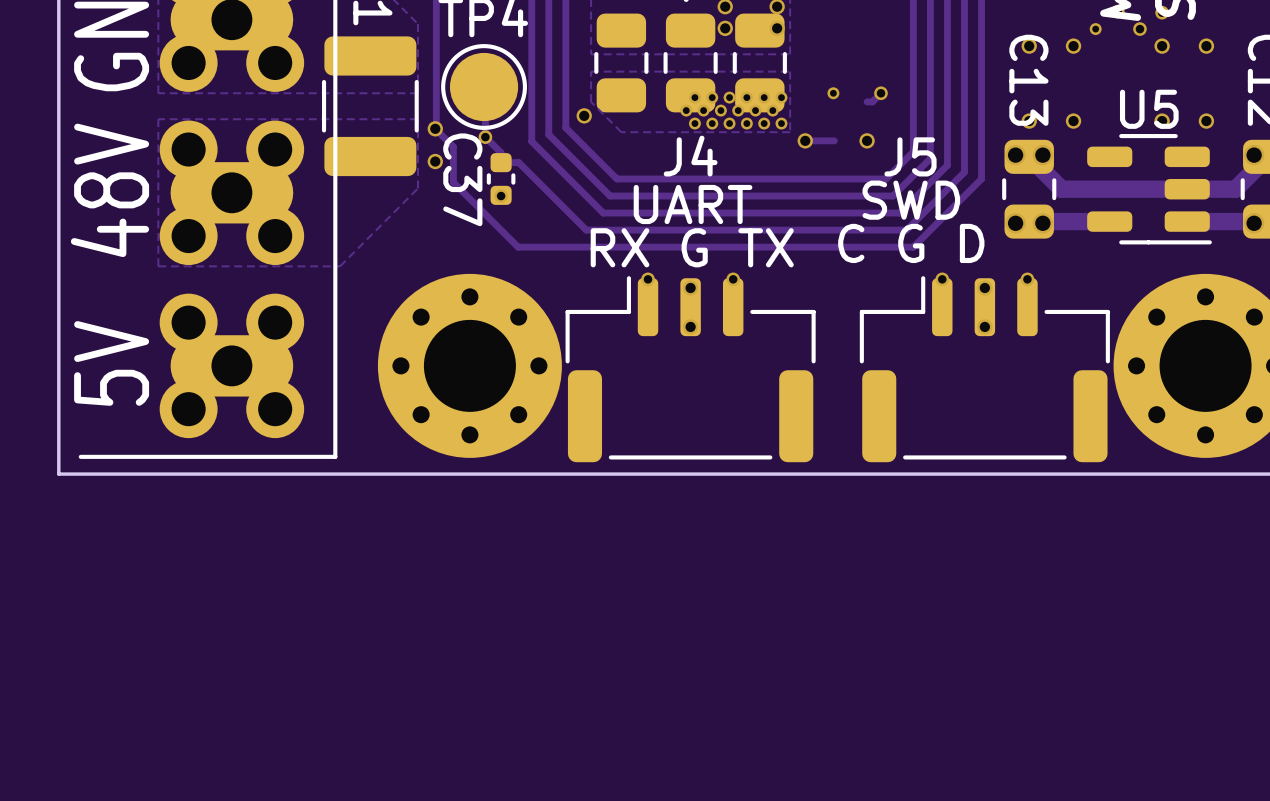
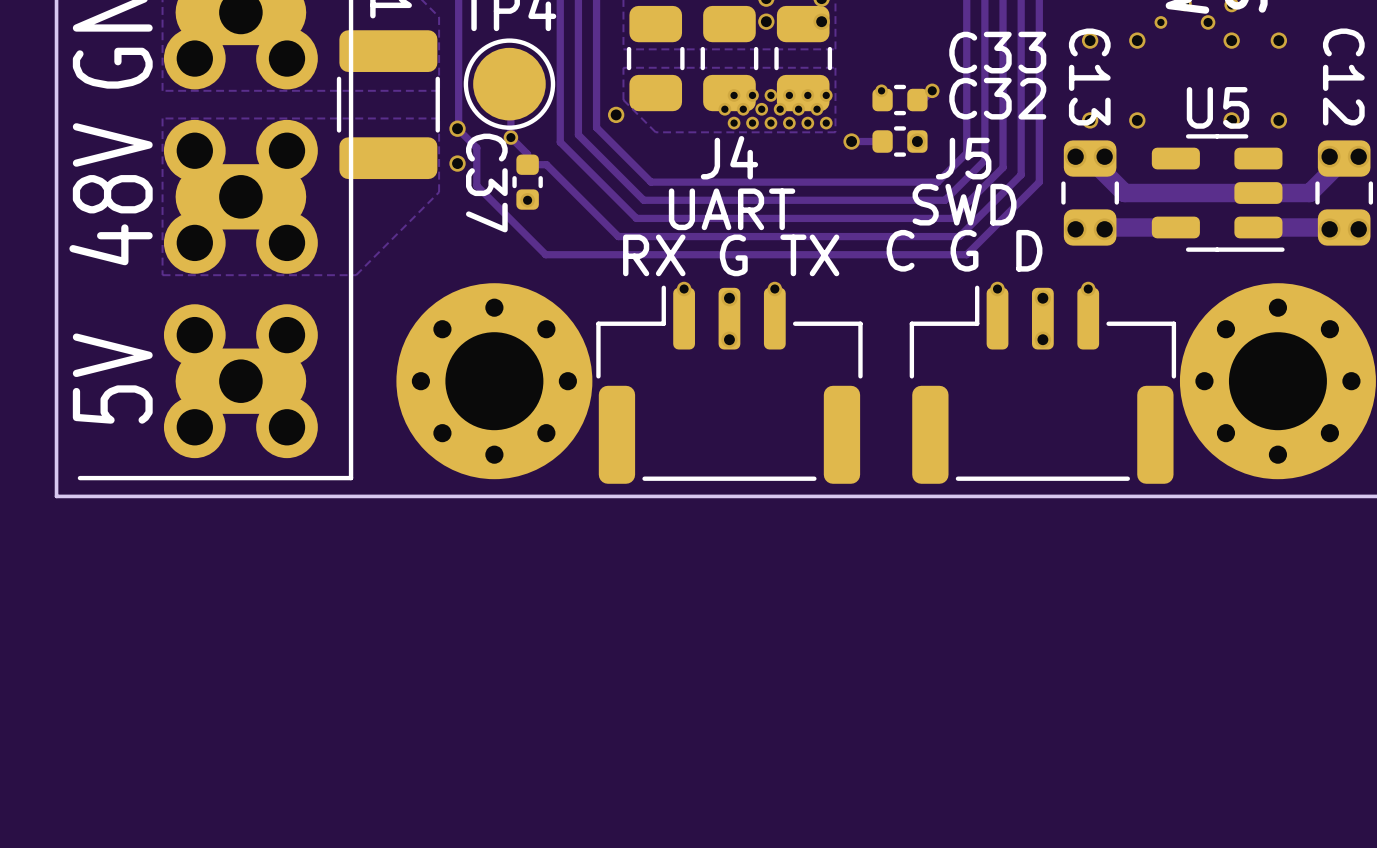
C33: none -> (900, 100)
C32: none -> (900, 141)

